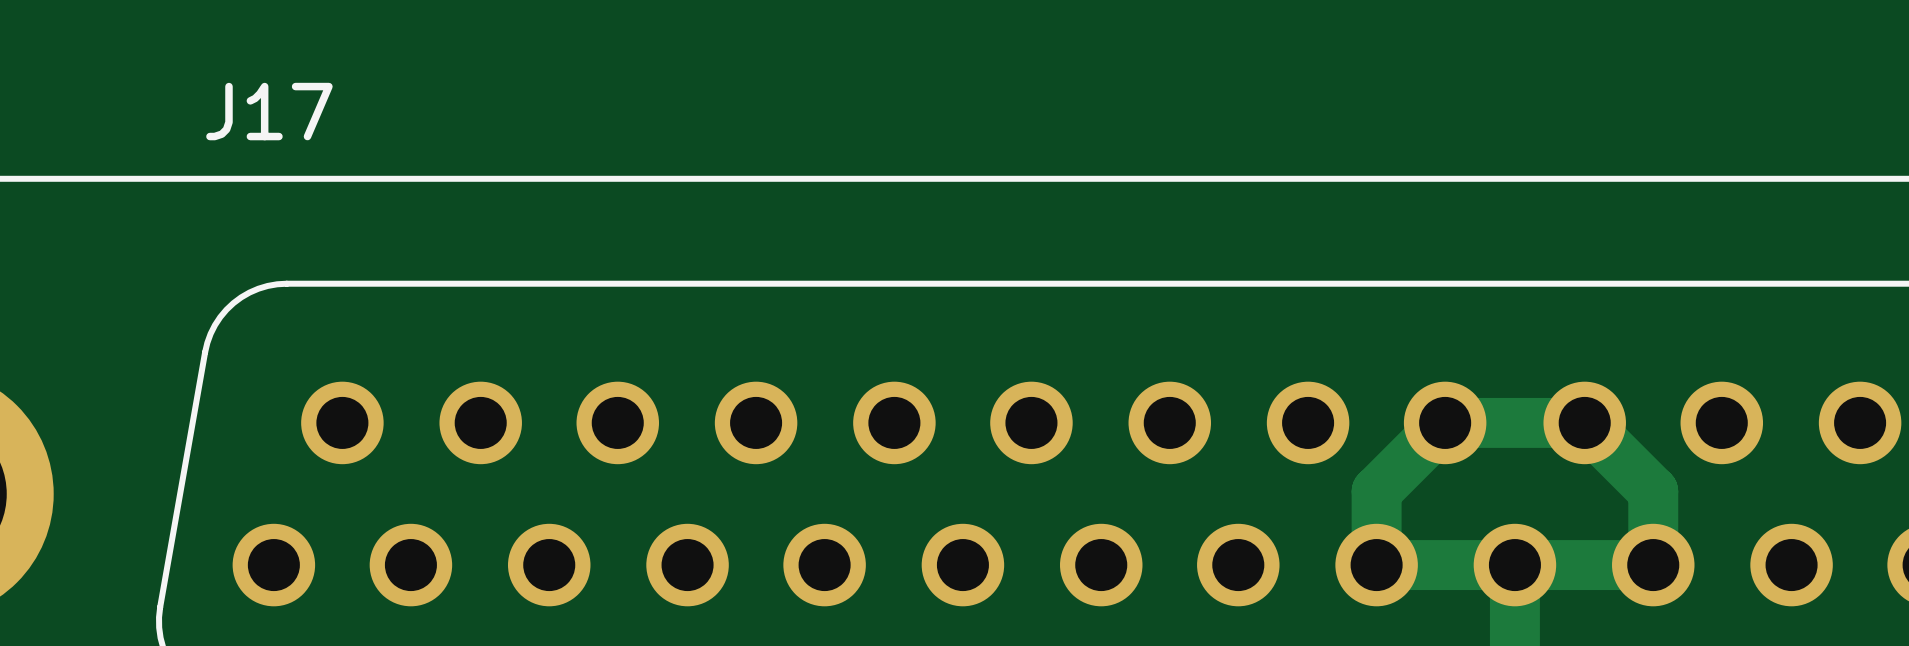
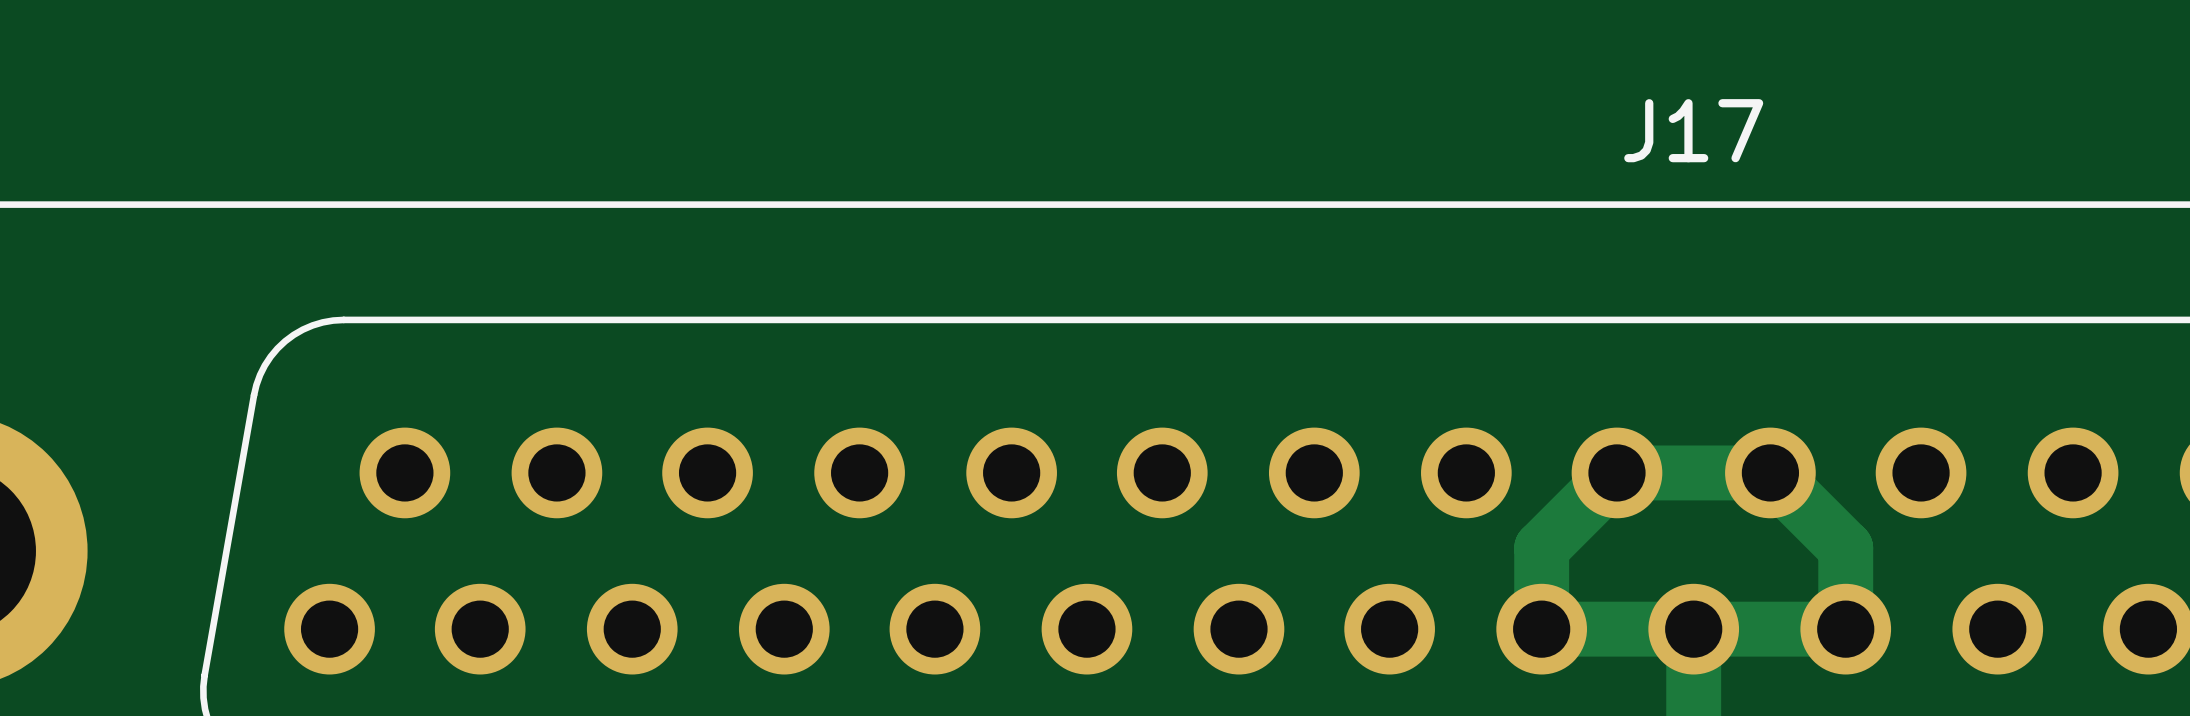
J17 name position: J17 (269, 111) -> J17 (1693, 130)

